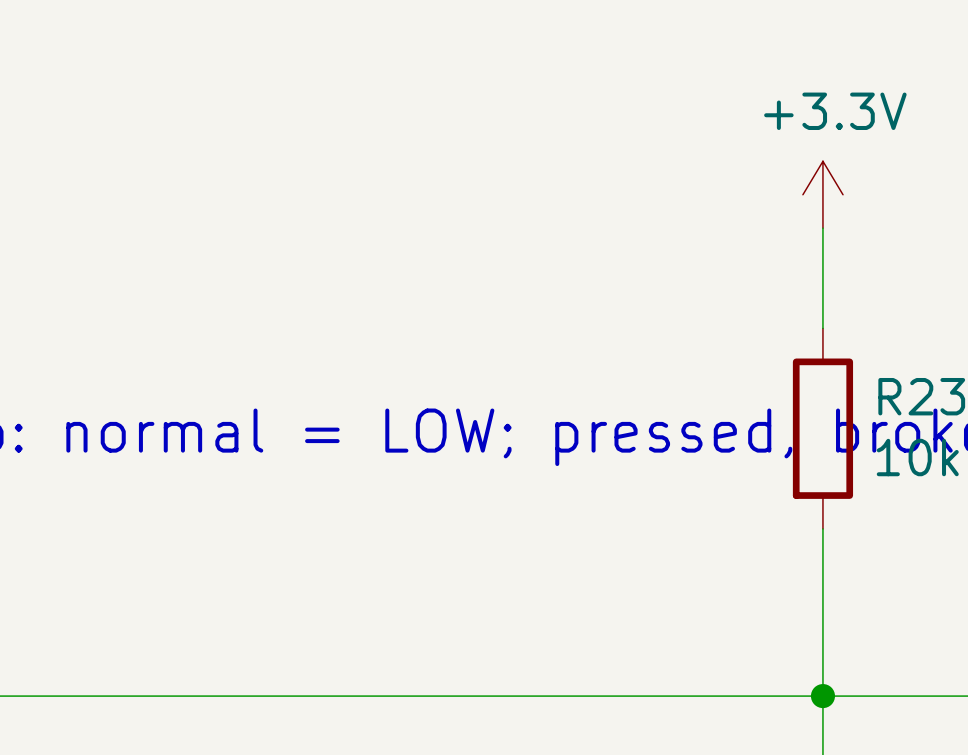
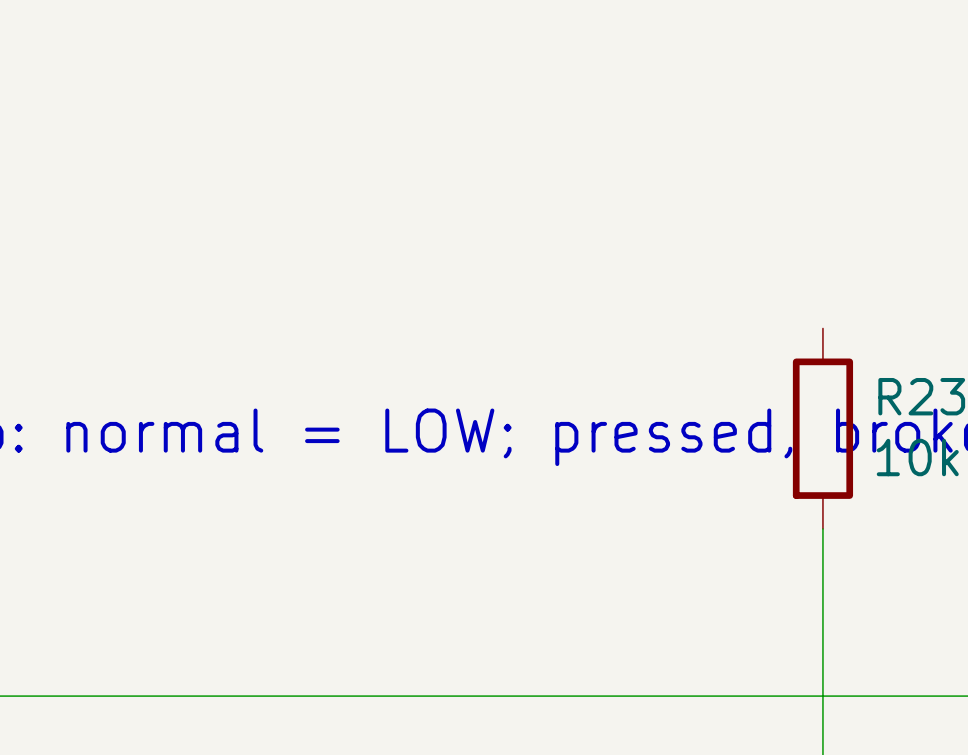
power symbol: +3.3V (822, 194) -> none
wire: (822, 228) (822, 328) -> none
junction: (822, 696) -> none

